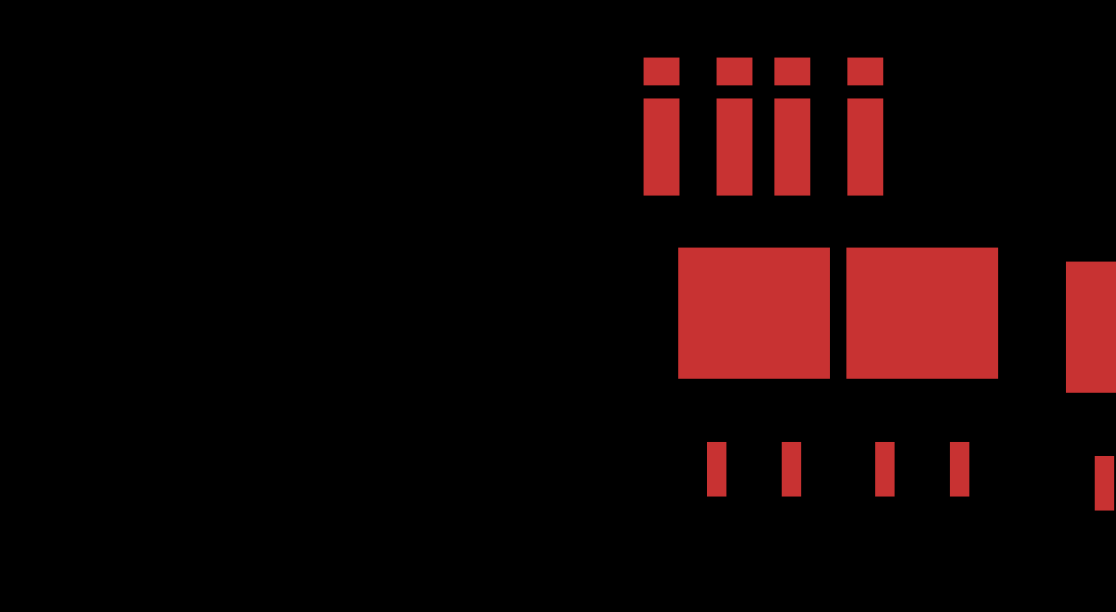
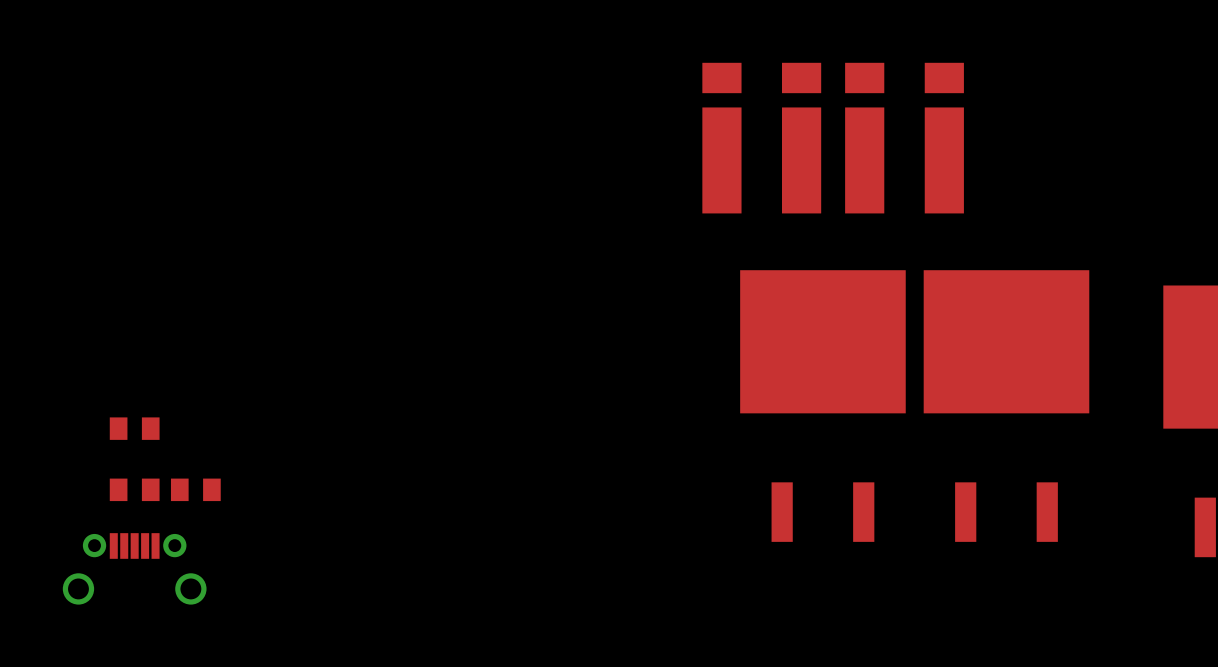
part: none -> (134, 428)
part: none -> (134, 489)
part: none -> (195, 489)
part: none -> (134, 568)

